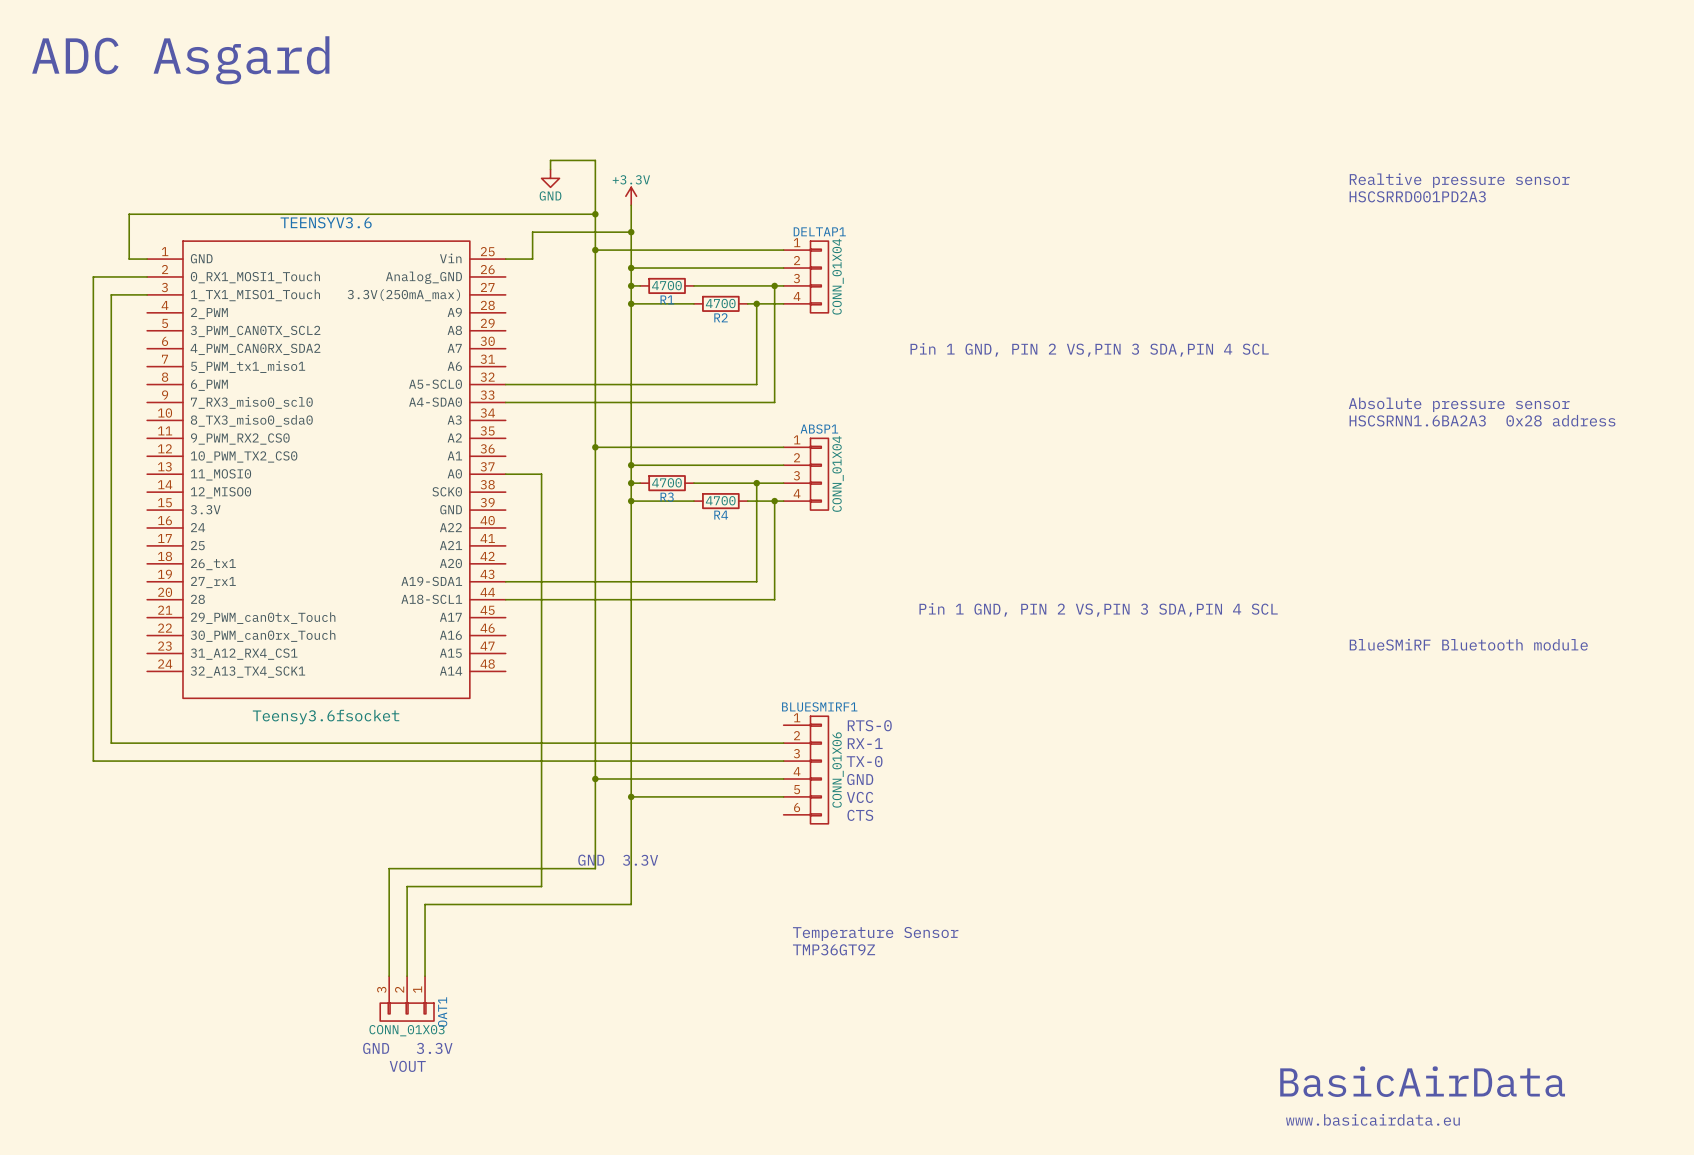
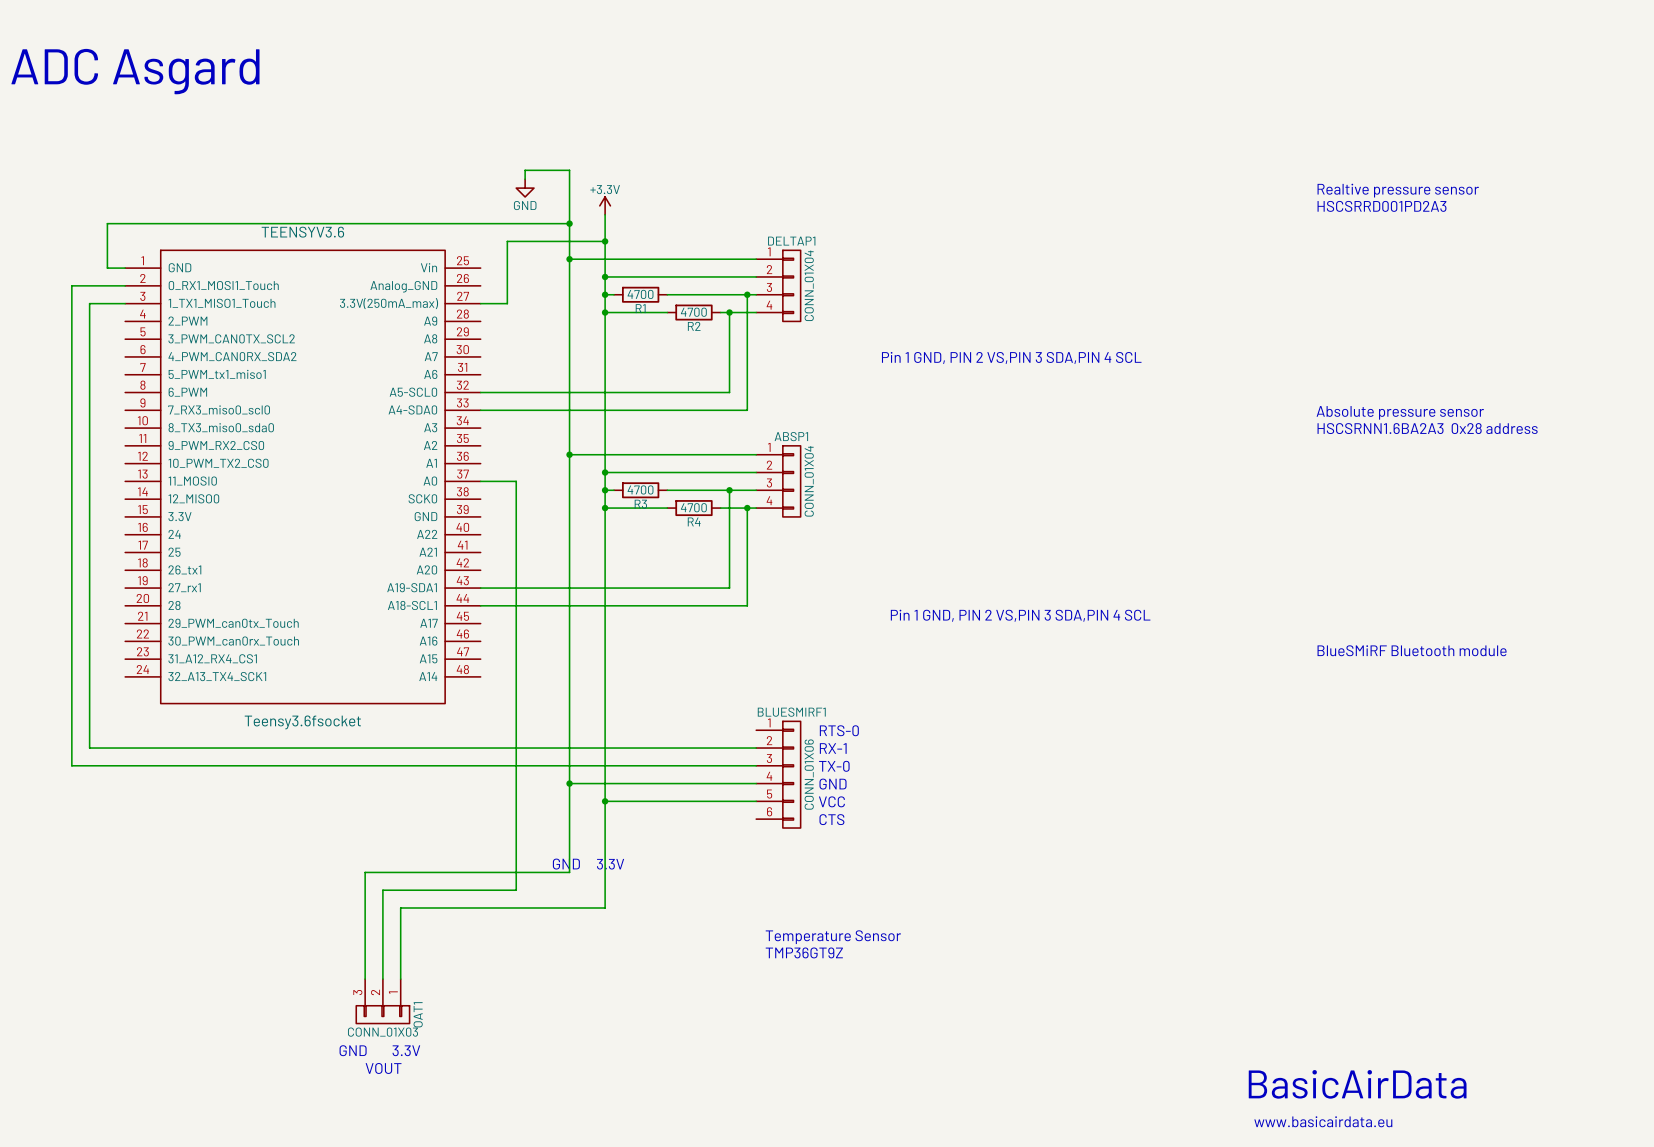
wire: (505, 259) (532, 259) -> (480, 303) (507, 303) (507, 268)

